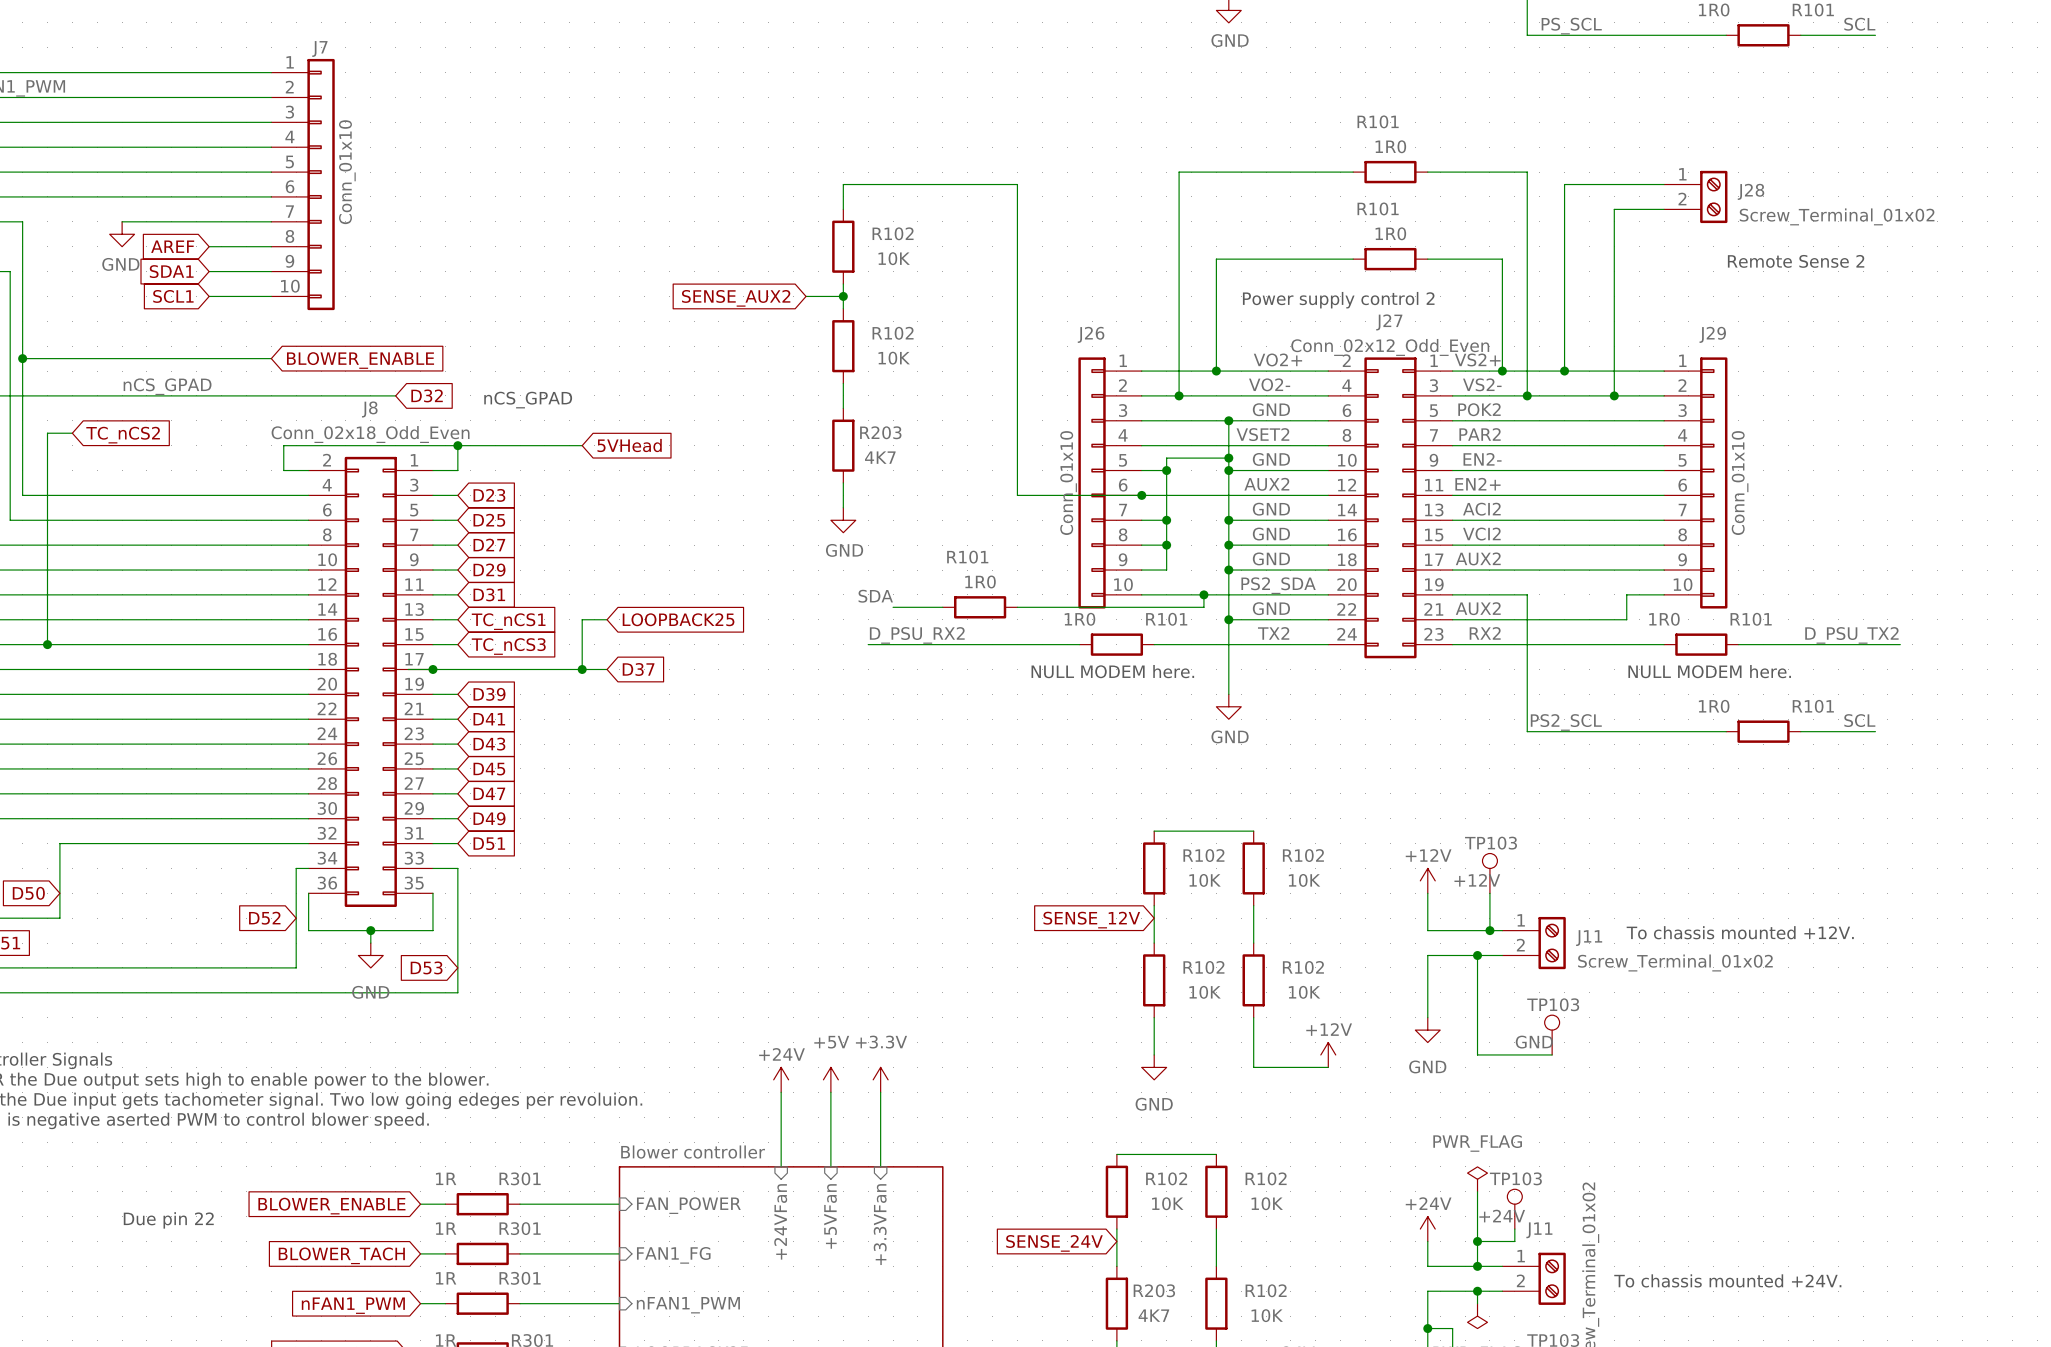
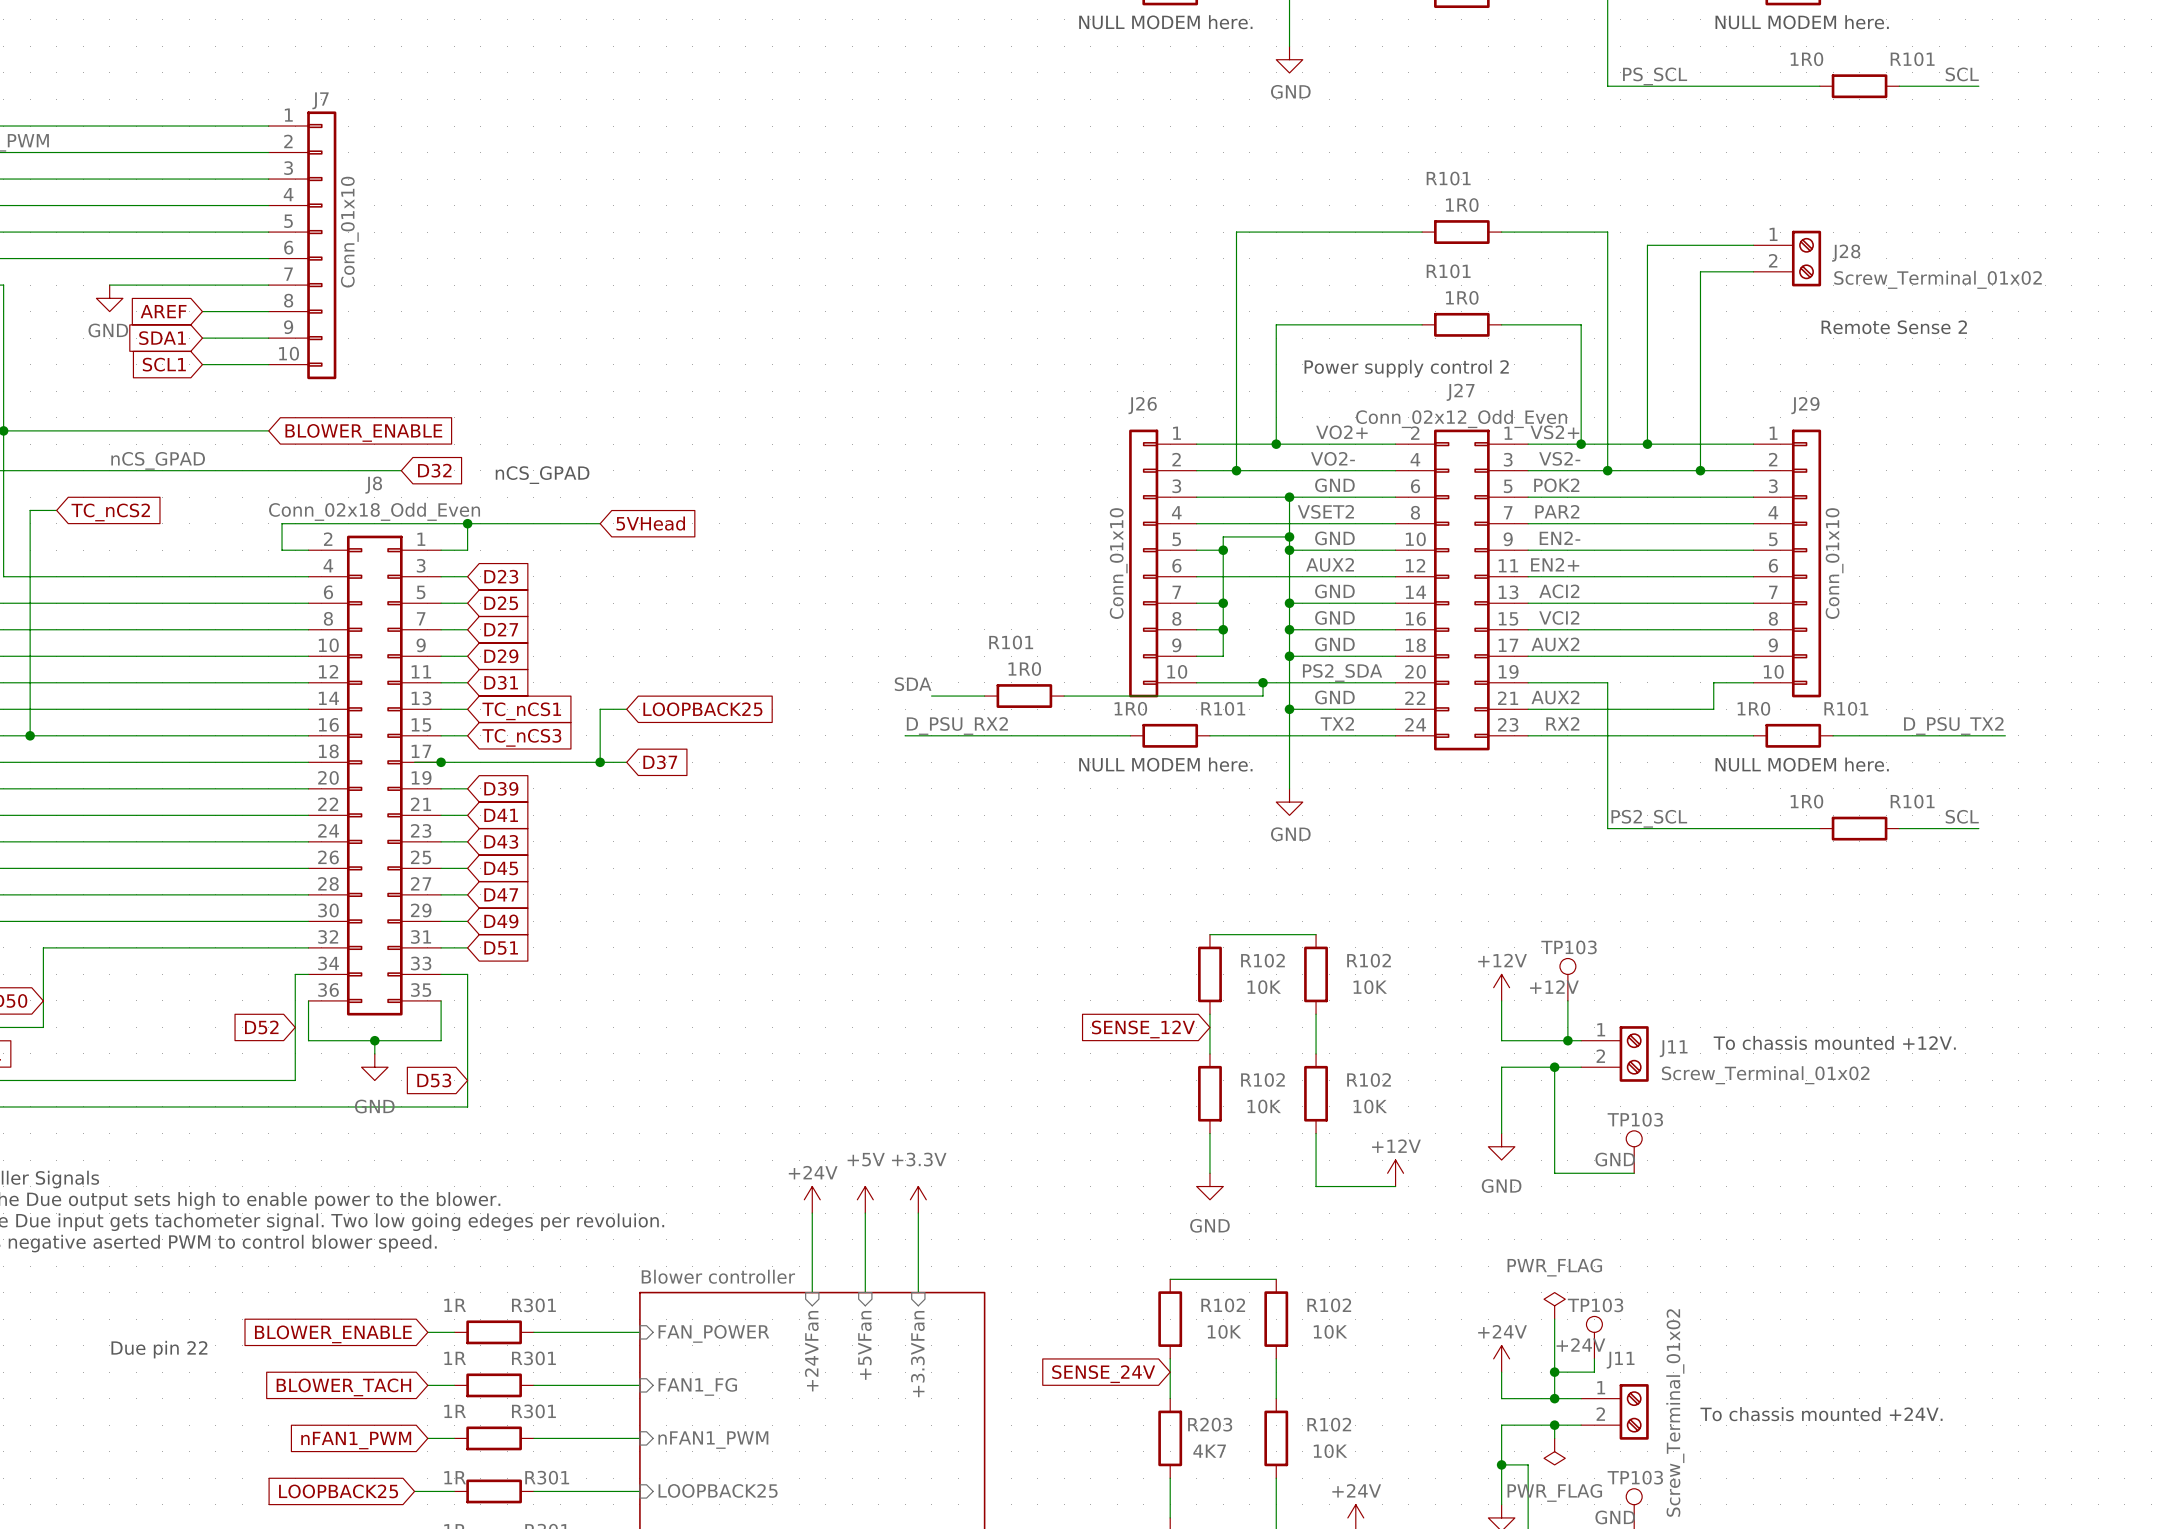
wire: (843, 209) (843, 184) (1017, 184) (1017, 495) (1141, 495) -> none
R102: 10K (843, 246) -> none
wire: (843, 284) (843, 308) -> none
wire: (806, 296) (843, 296) -> none
junction: (843, 296) -> none
global label: SENSE_AUX2 (736, 298) -> none
R102: 10K (843, 346) -> none
wire: (843, 383) (843, 408) -> none
R203: 4K7 (843, 445) -> none
wire: (843, 482) (843, 507) -> none
junction: (1141, 495) -> none
power symbol: GND (843, 520) -> none

